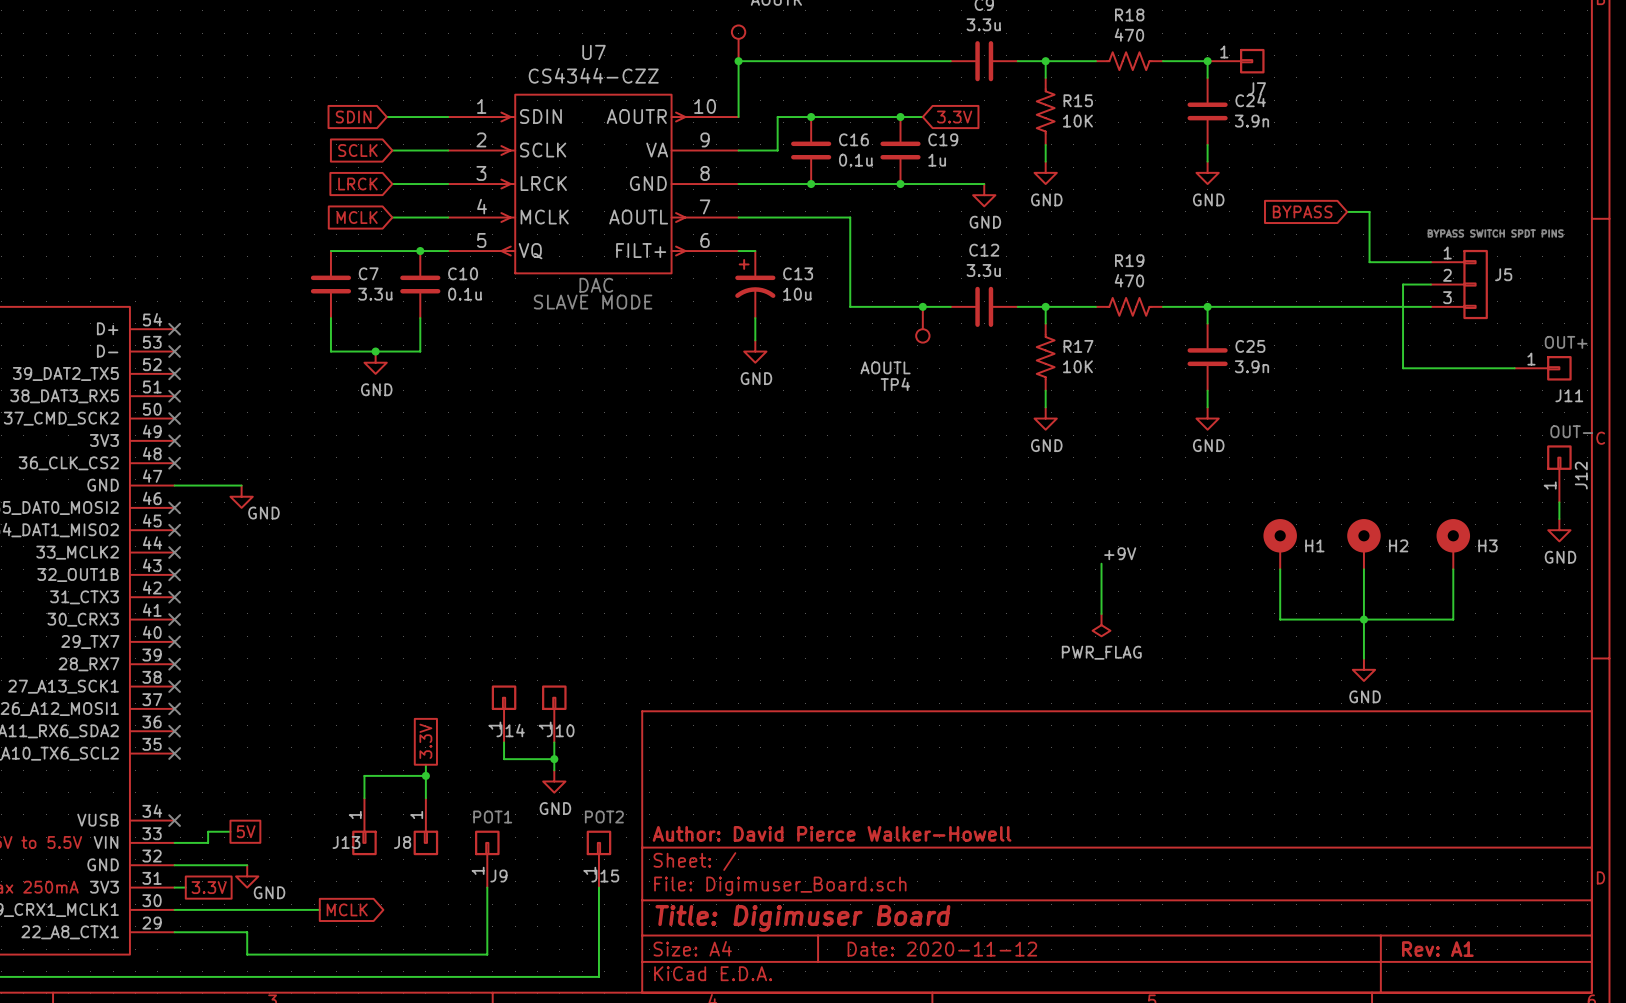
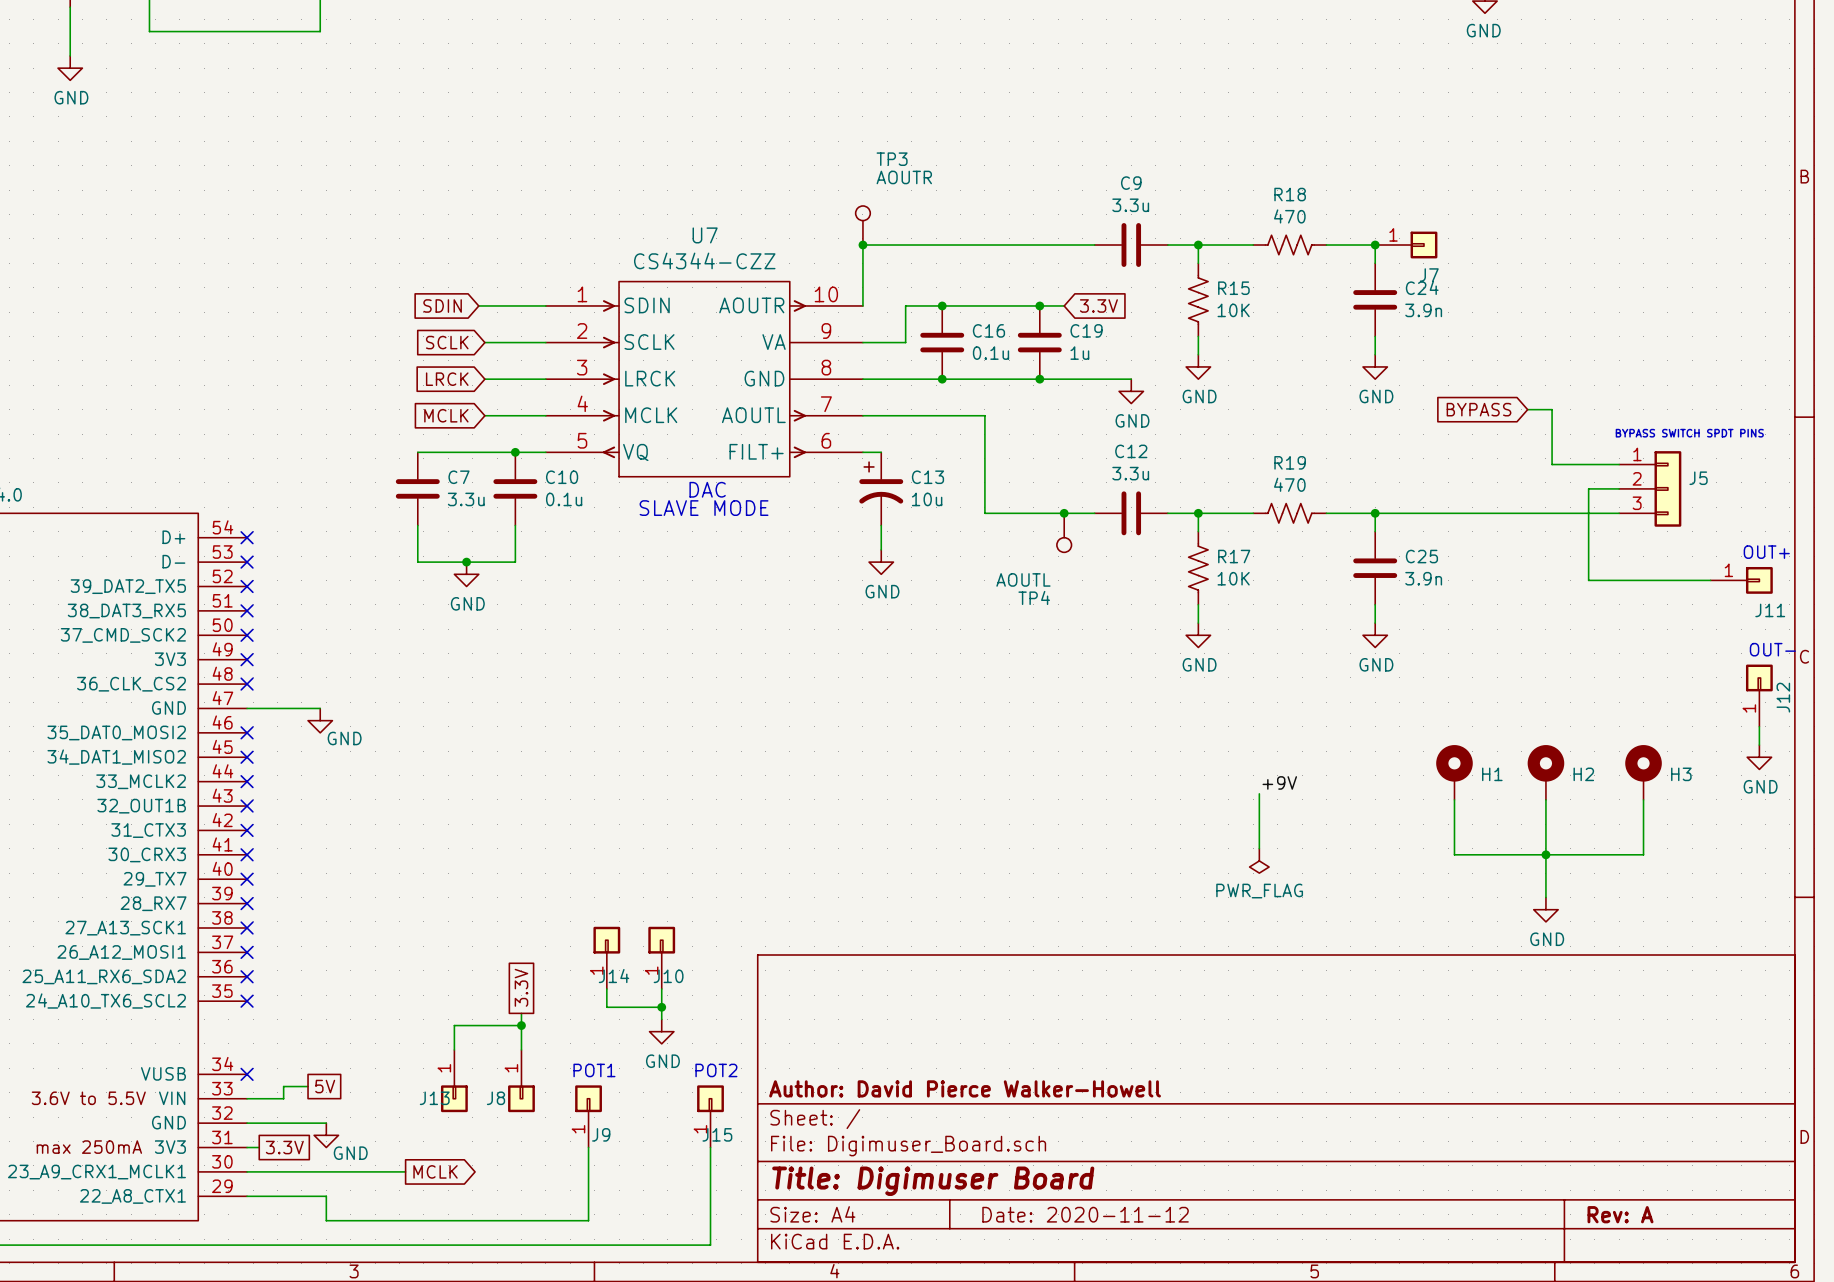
title block: Rev: A1 (1437, 949) -> Rev: A (1620, 1214)

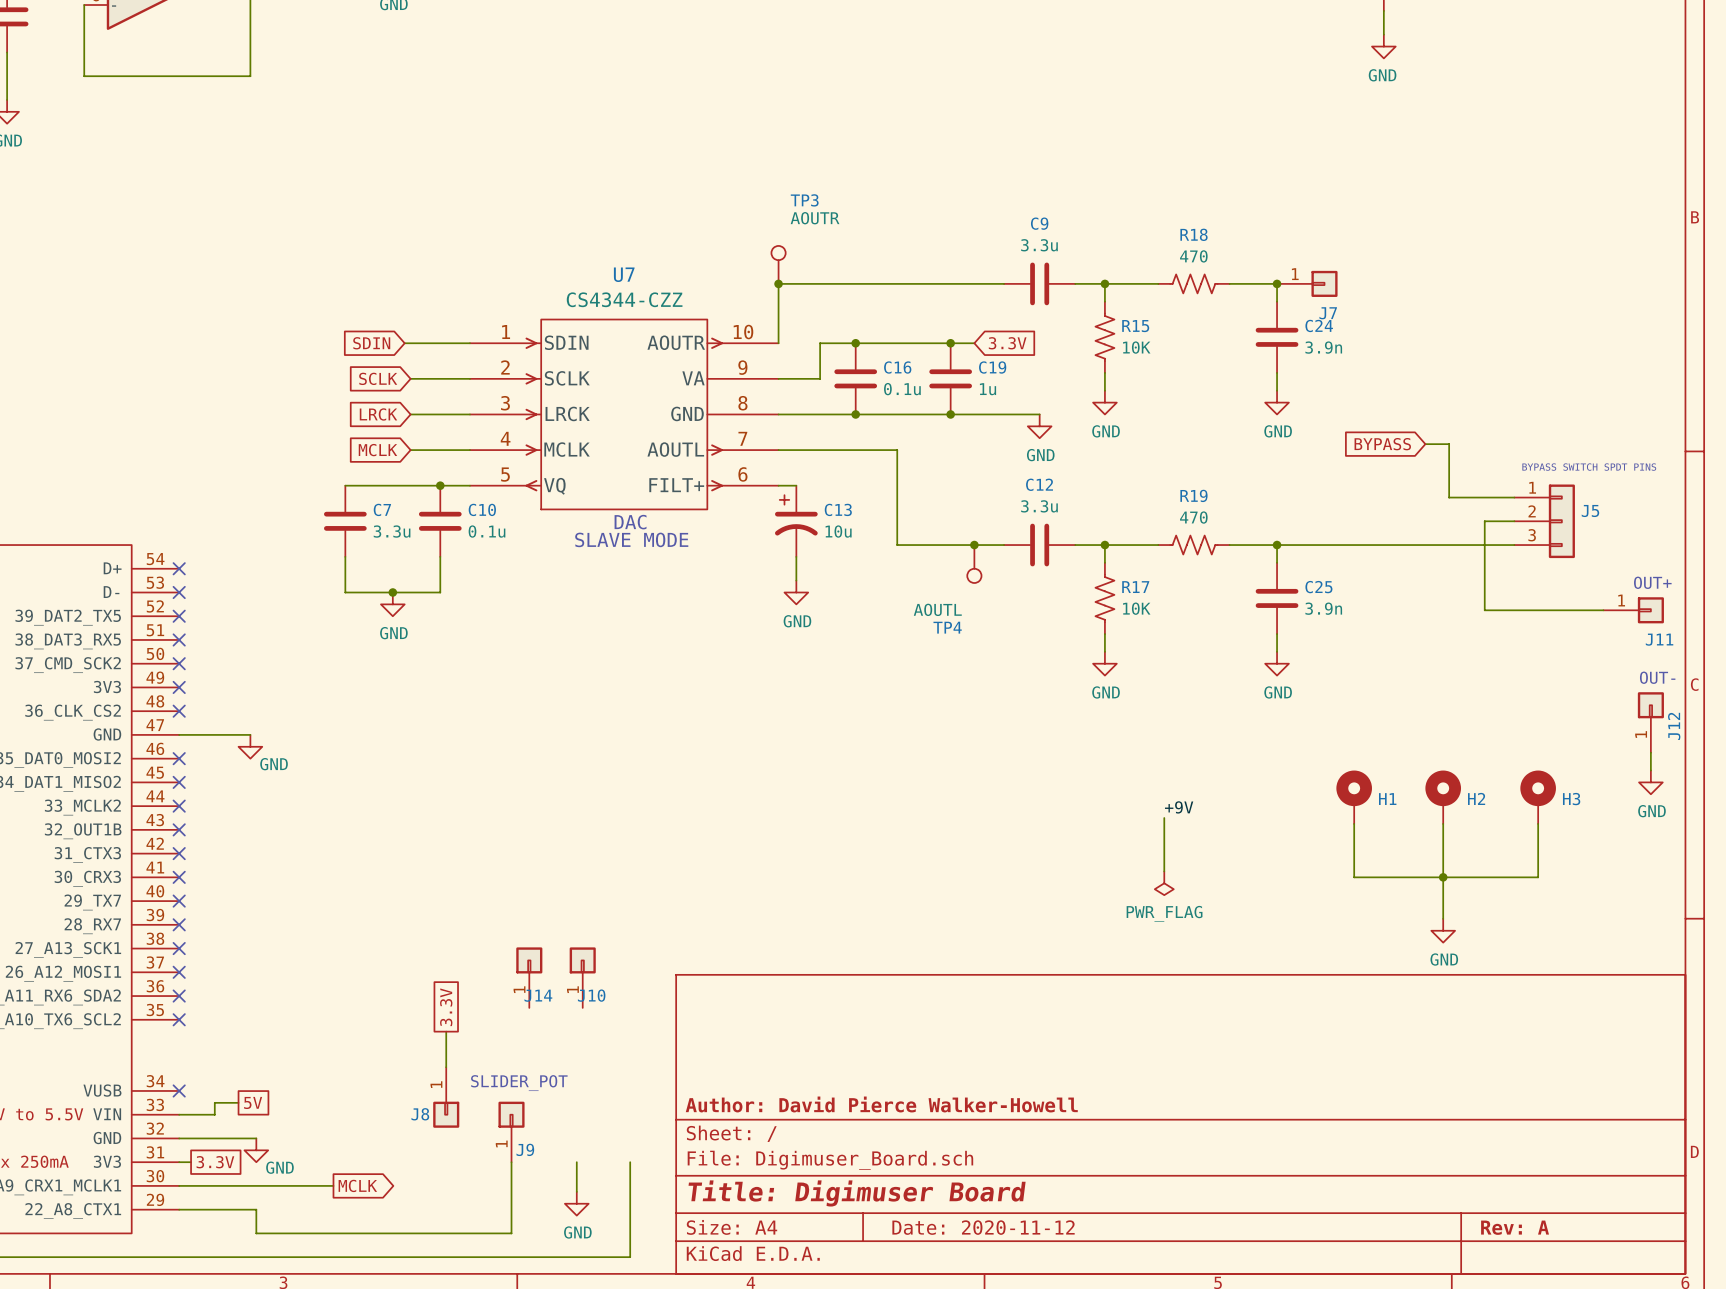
wire: (606, 988) (606, 1007) (661, 1007) -> none
wire: (661, 988) (661, 1019) -> (576, 1162) (576, 1191)
junction: (661, 1007) -> none
wire: (521, 1025) (454, 1025) (454, 1049) -> none
junction: (521, 1025) -> none
power symbol position: GND (661, 1031) -> GND (576, 1203)
text: none -> SLIDER_POT (519, 1083)
text: POT1 (594, 1070) -> none
text: POT2 (716, 1070) -> none
J13: (454, 1081) -> none
J15: (710, 1116) -> none

